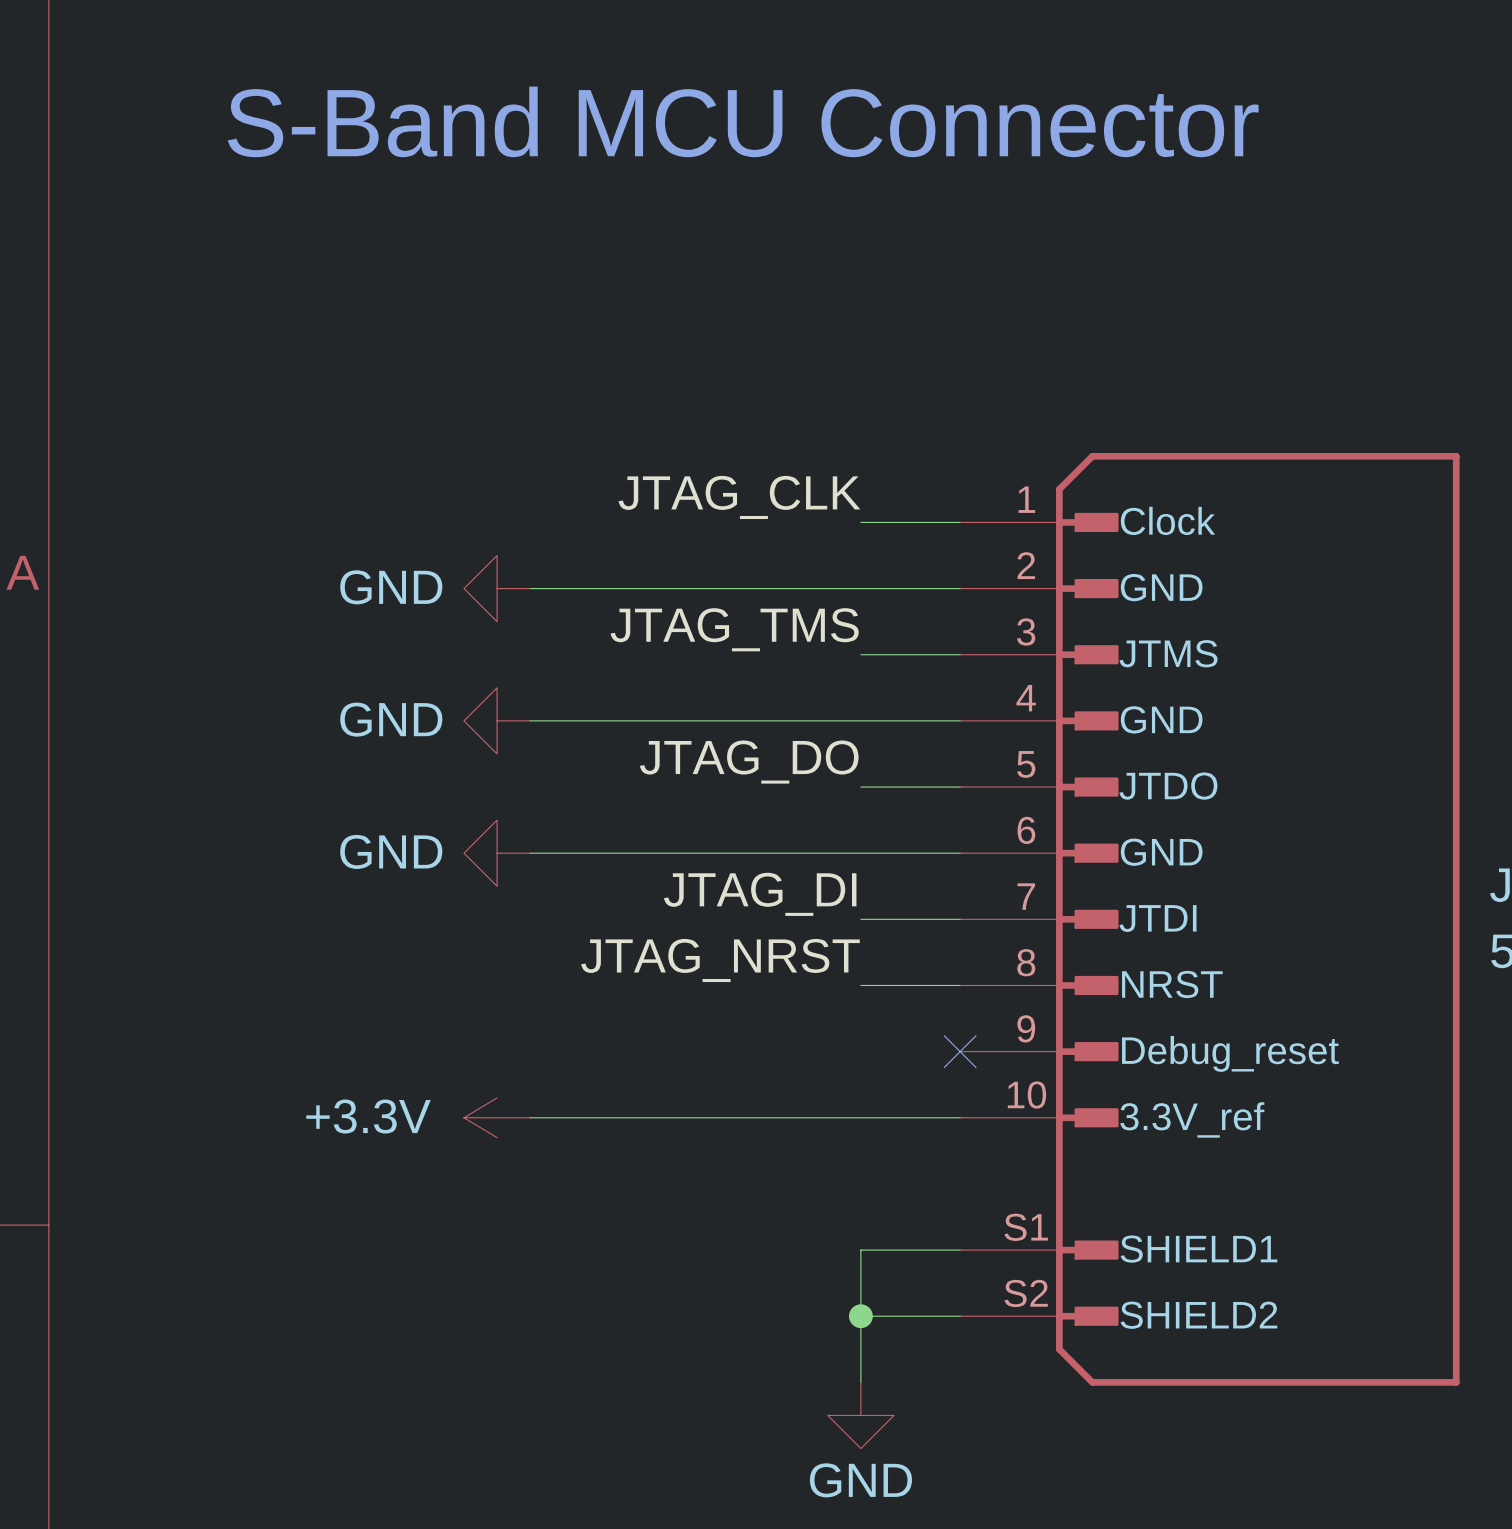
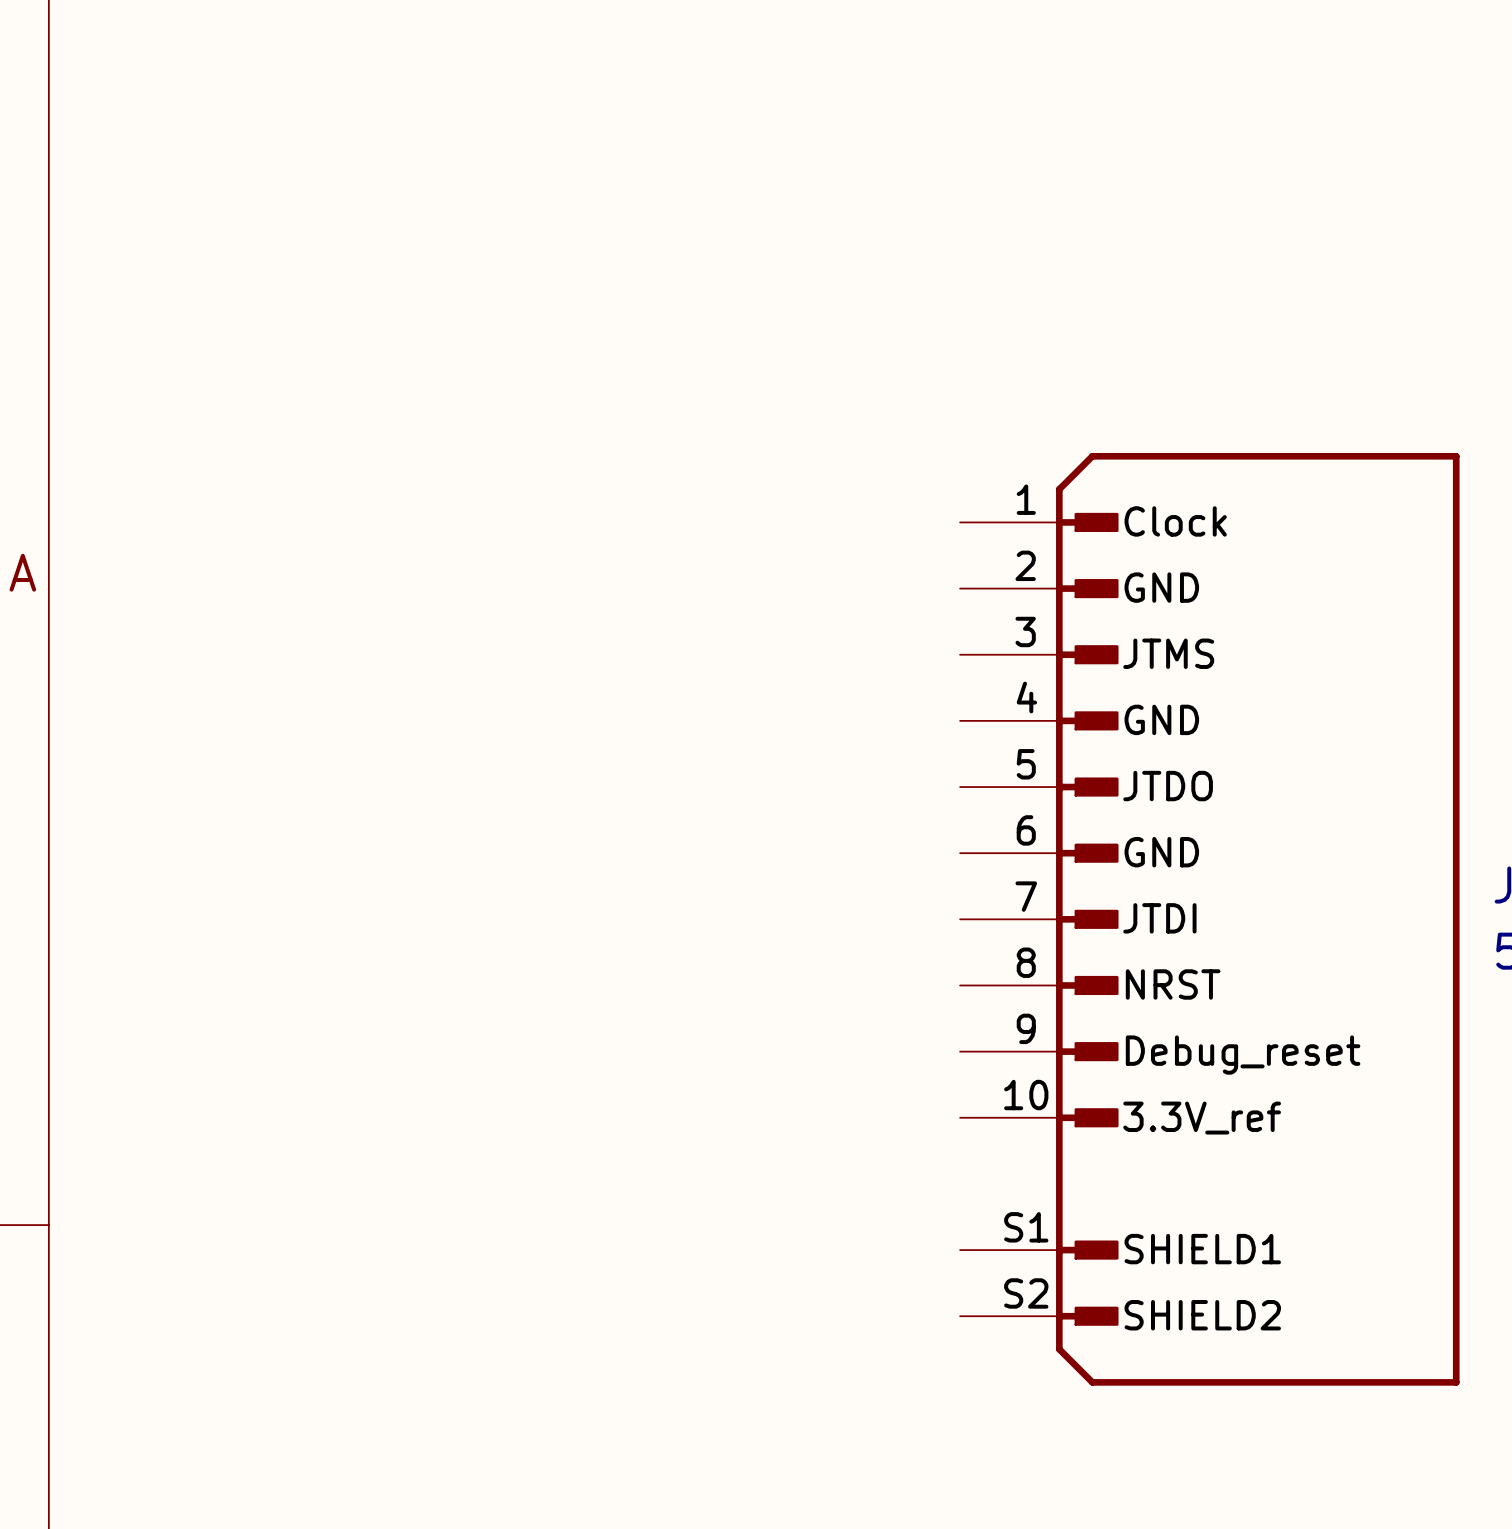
text: S-Band MCU Connector (743, 121) -> none
label: JTAG_CLK (739, 497) -> none
wire: (860, 522) (960, 522) -> none
power symbol: GND (497, 588) -> none
wire: (530, 588) (960, 588) -> none
label: JTAG_TMS (734, 629) -> none
wire: (860, 654) (960, 654) -> none
power symbol: GND (497, 720) -> none
wire: (530, 720) (960, 720) -> none
label: JTAG_DO (749, 762) -> none
wire: (860, 787) (960, 787) -> none
power symbol: GND (497, 853) -> none
wire: (530, 853) (960, 853) -> none
label: JTAG_DI (760, 894) -> none
wire: (860, 919) (960, 919) -> none
label: JTAG_NRST (720, 960) -> none
wire: (860, 985) (960, 985) -> none
no-connect mark: (960, 1051) -> none
power symbol: +3.3V (497, 1117) -> none
wire: (530, 1117) (960, 1117) -> none
wire: (960, 1250) (860, 1250) (860, 1382) -> none
wire: (860, 1316) (960, 1316) -> none
junction: (860, 1316) -> none
power symbol: GND (860, 1415) -> none

